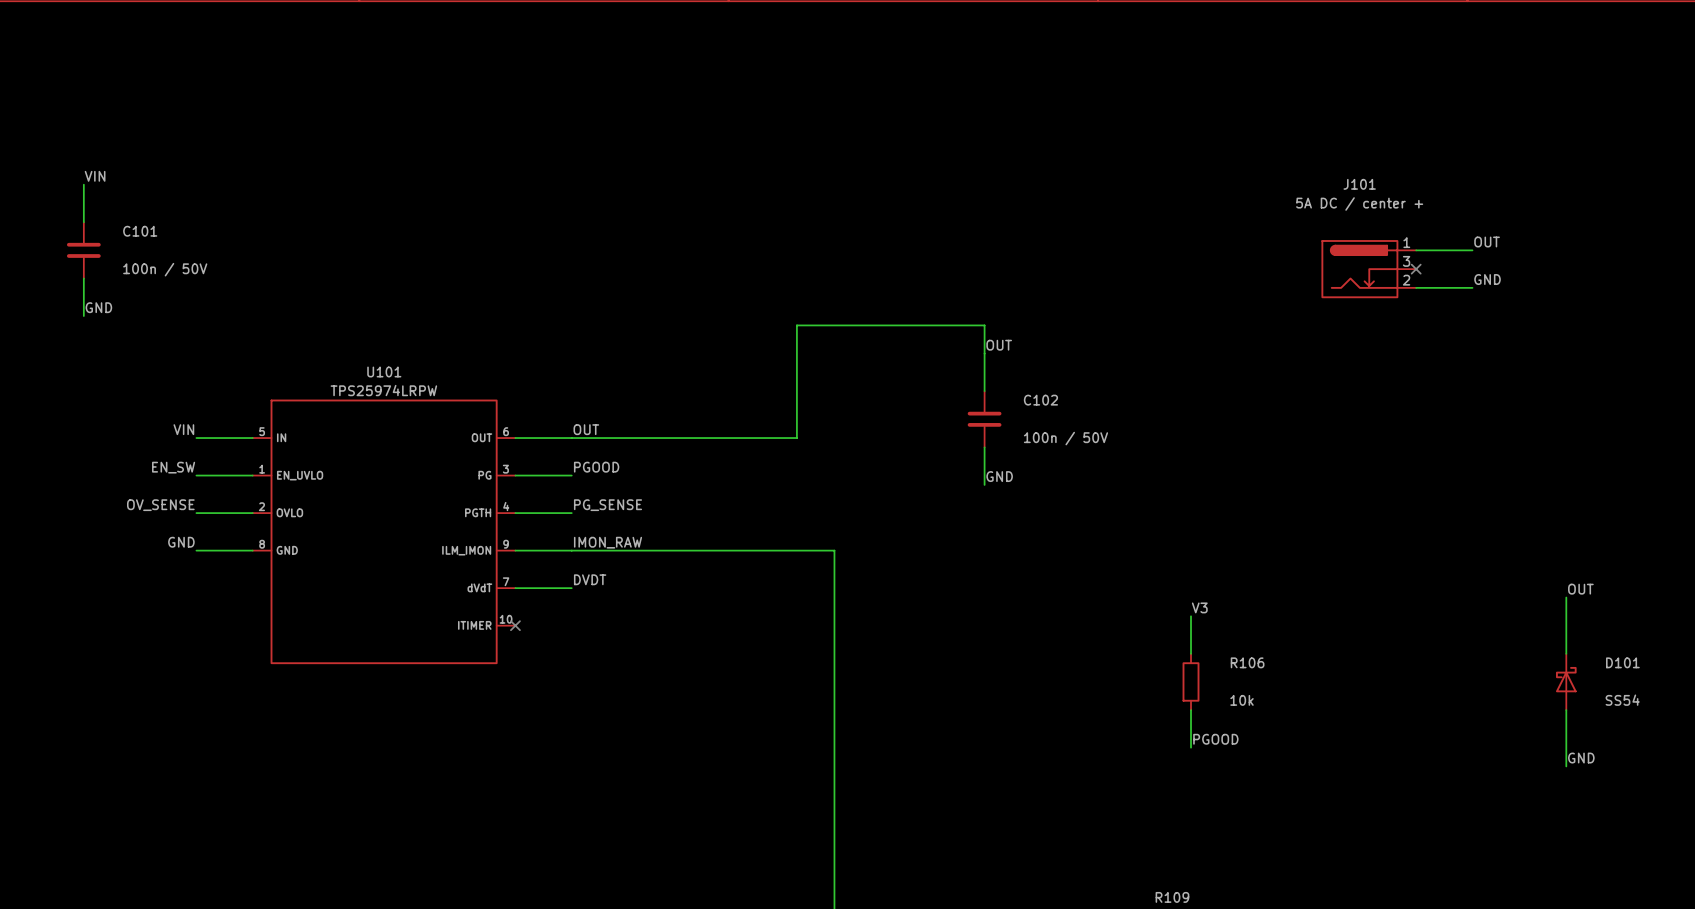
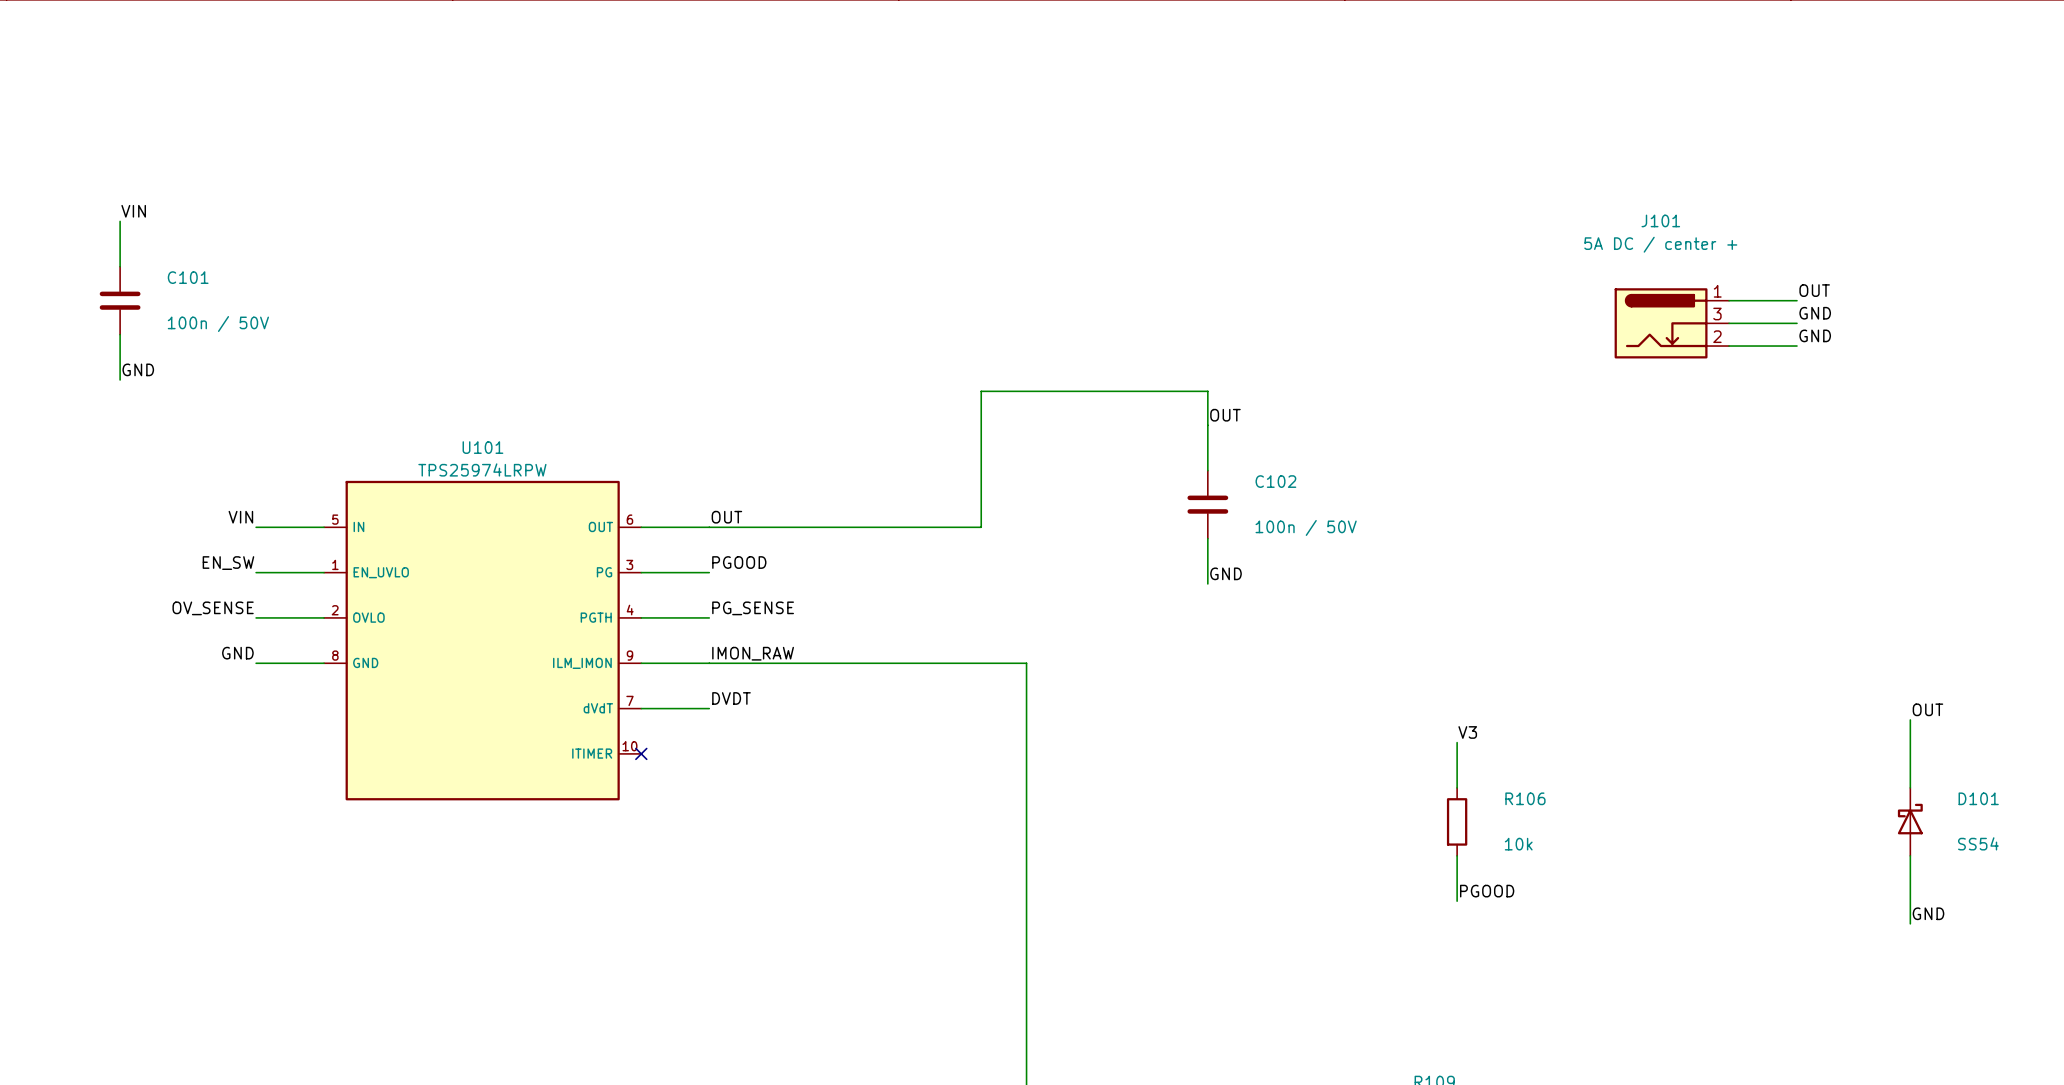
label: none -> GND (1815, 313)
wire: none -> (1729, 323) (1797, 323)
no-connect mark: (1416, 269) -> none

